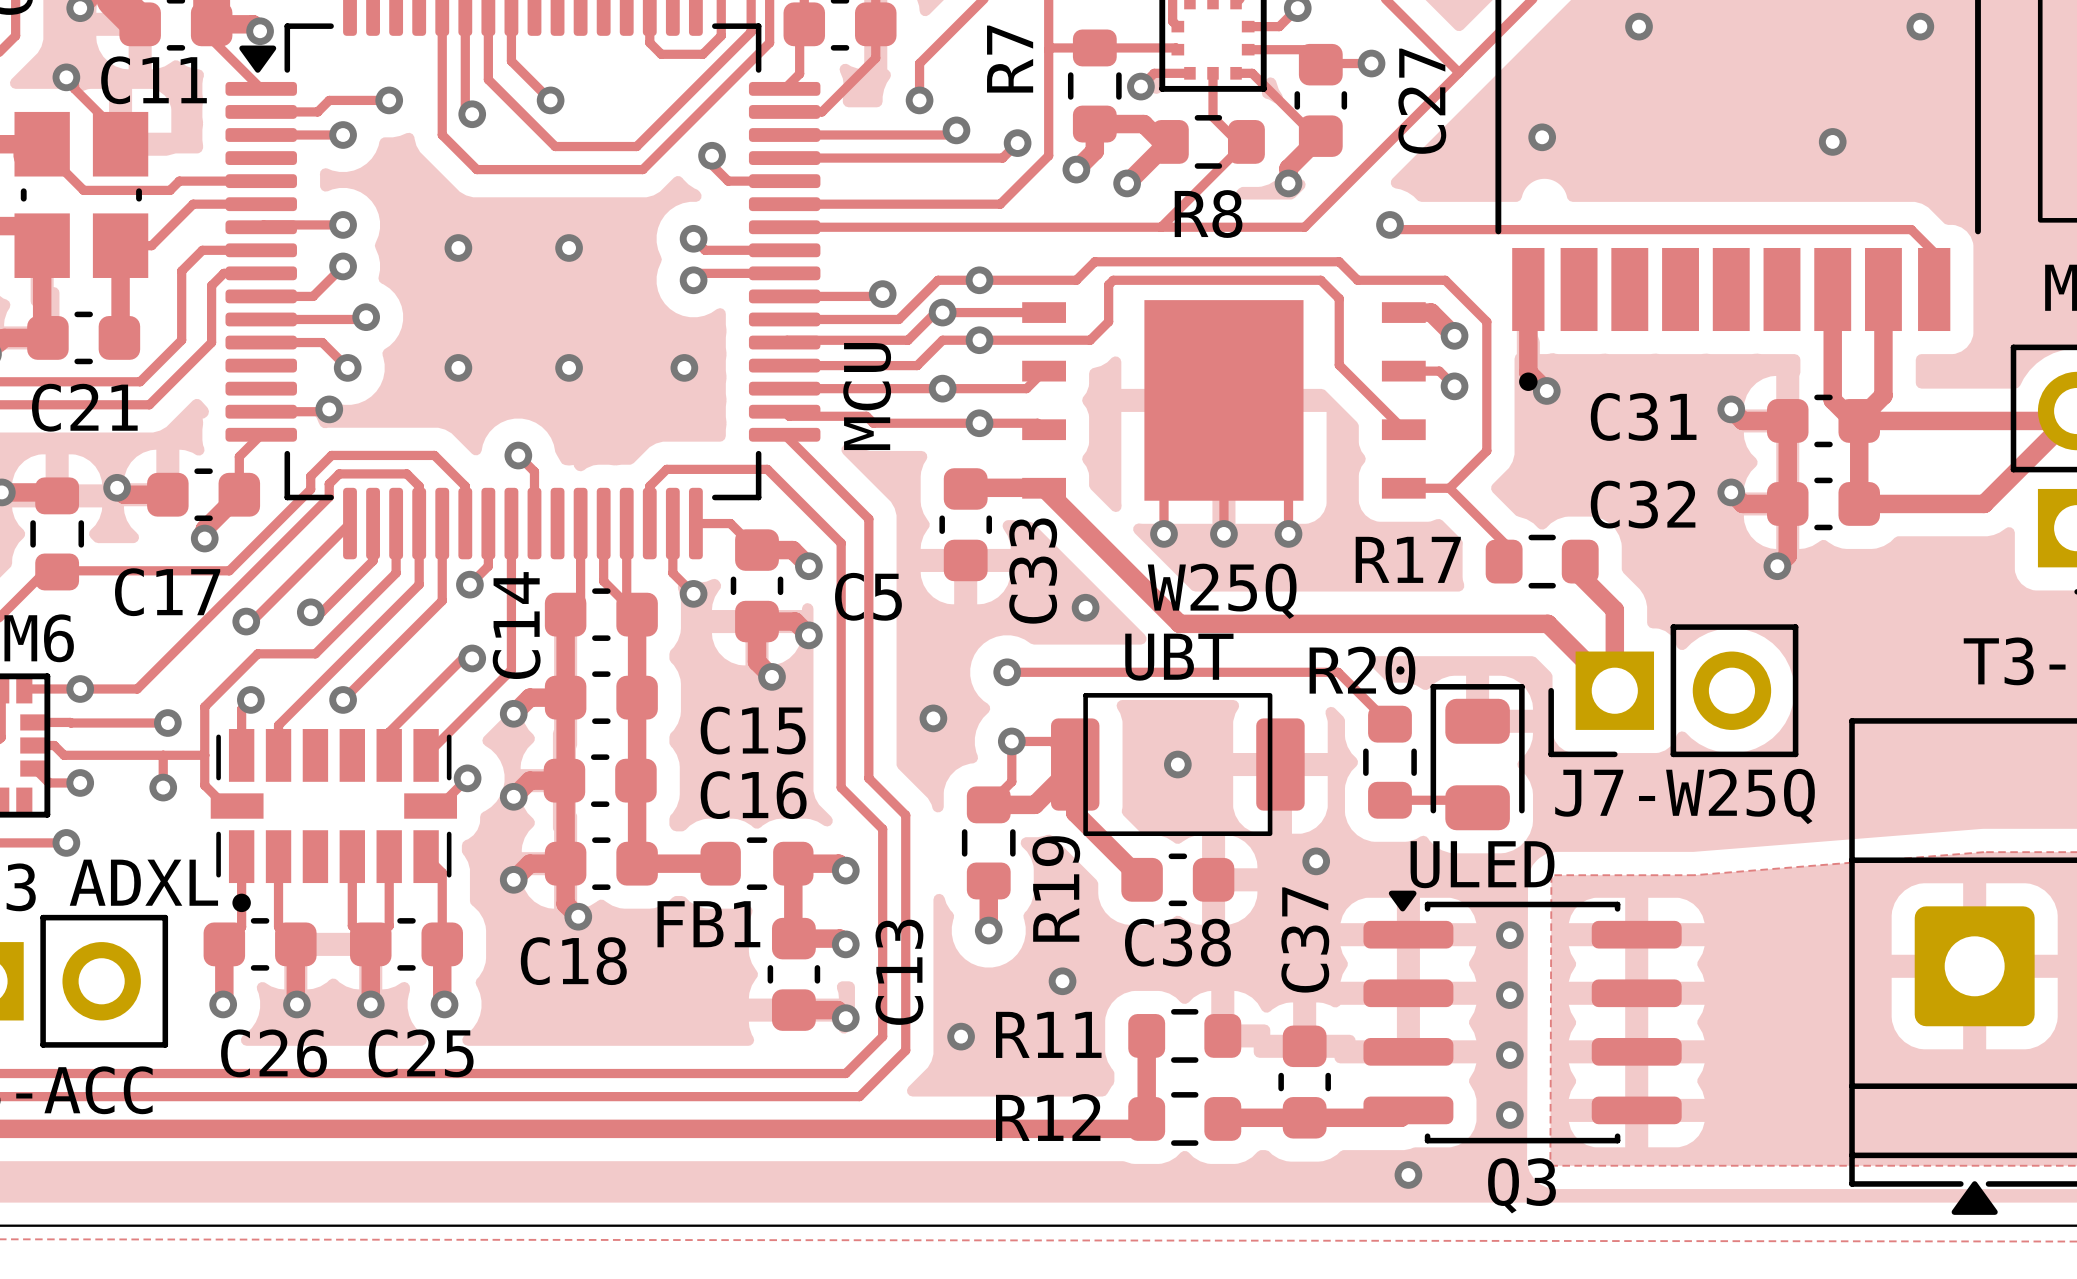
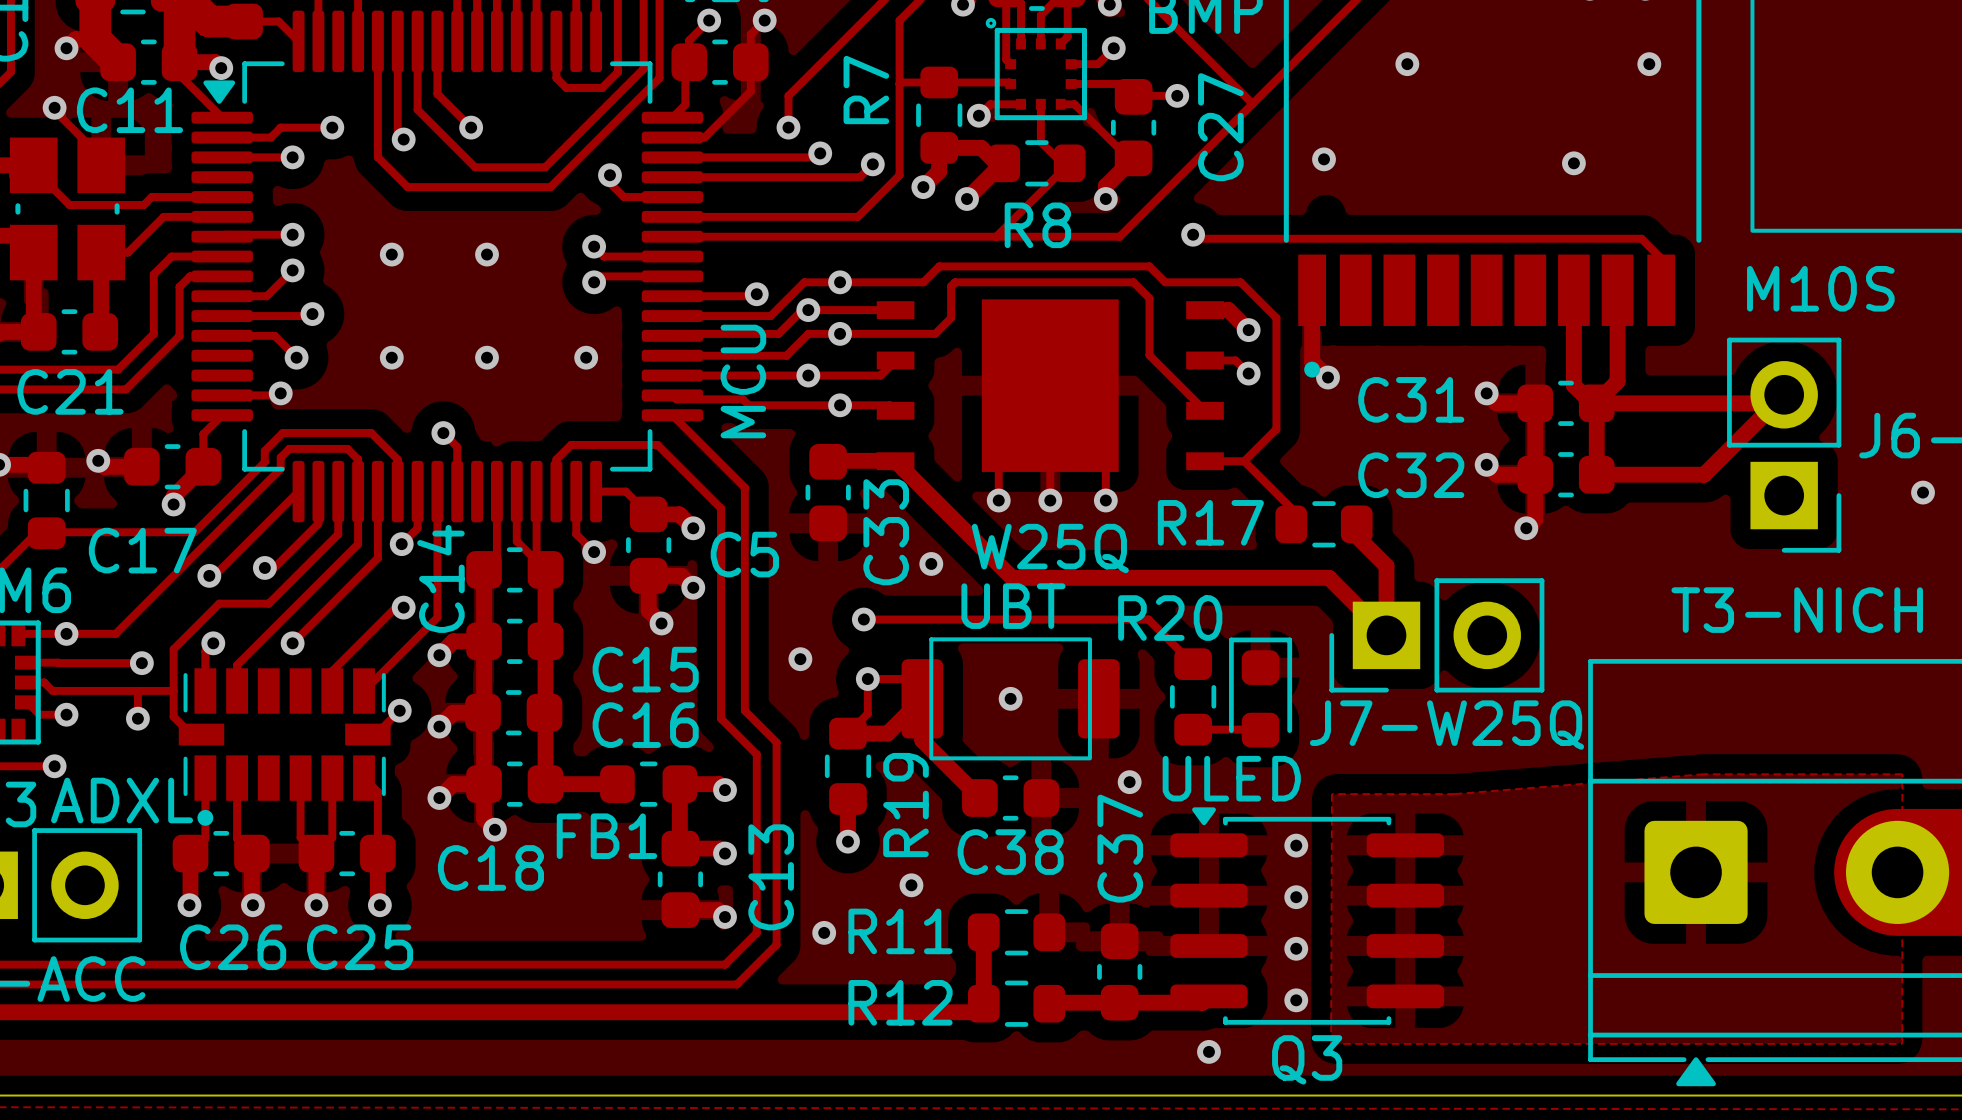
ULED footprint: [1430, 684, 1525, 831] -> [1229, 637, 1293, 748]
ULED name position: ULED (1482, 864) -> ULED (1231, 778)

